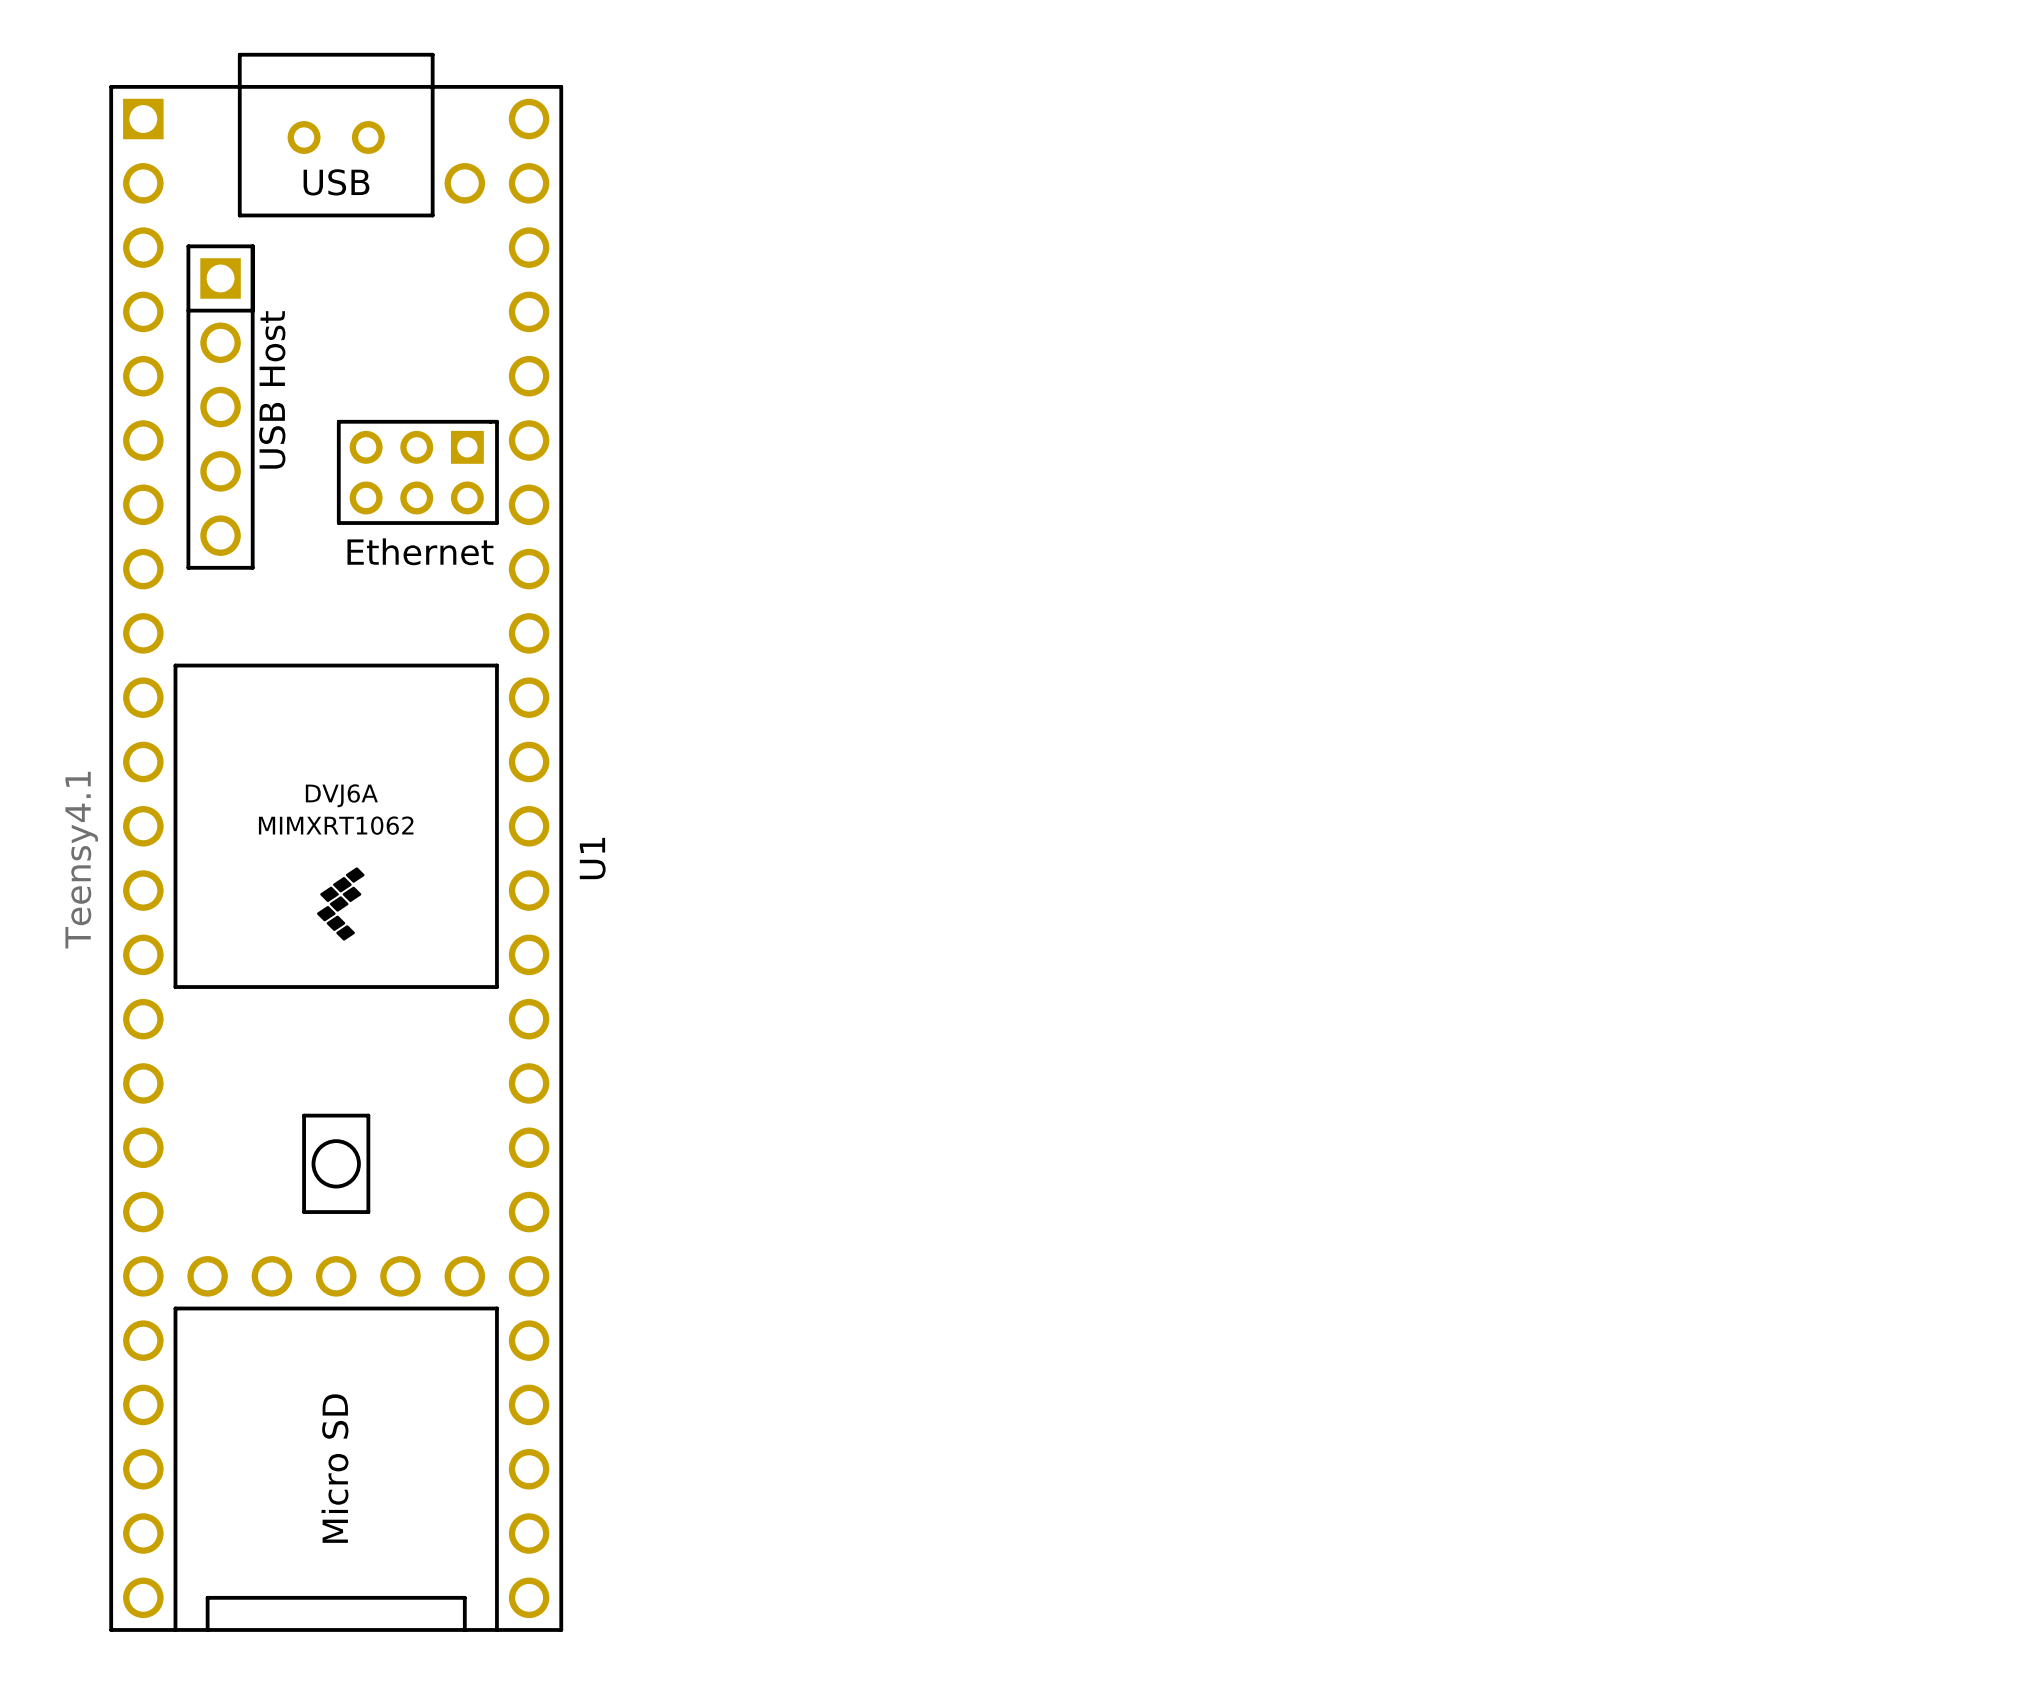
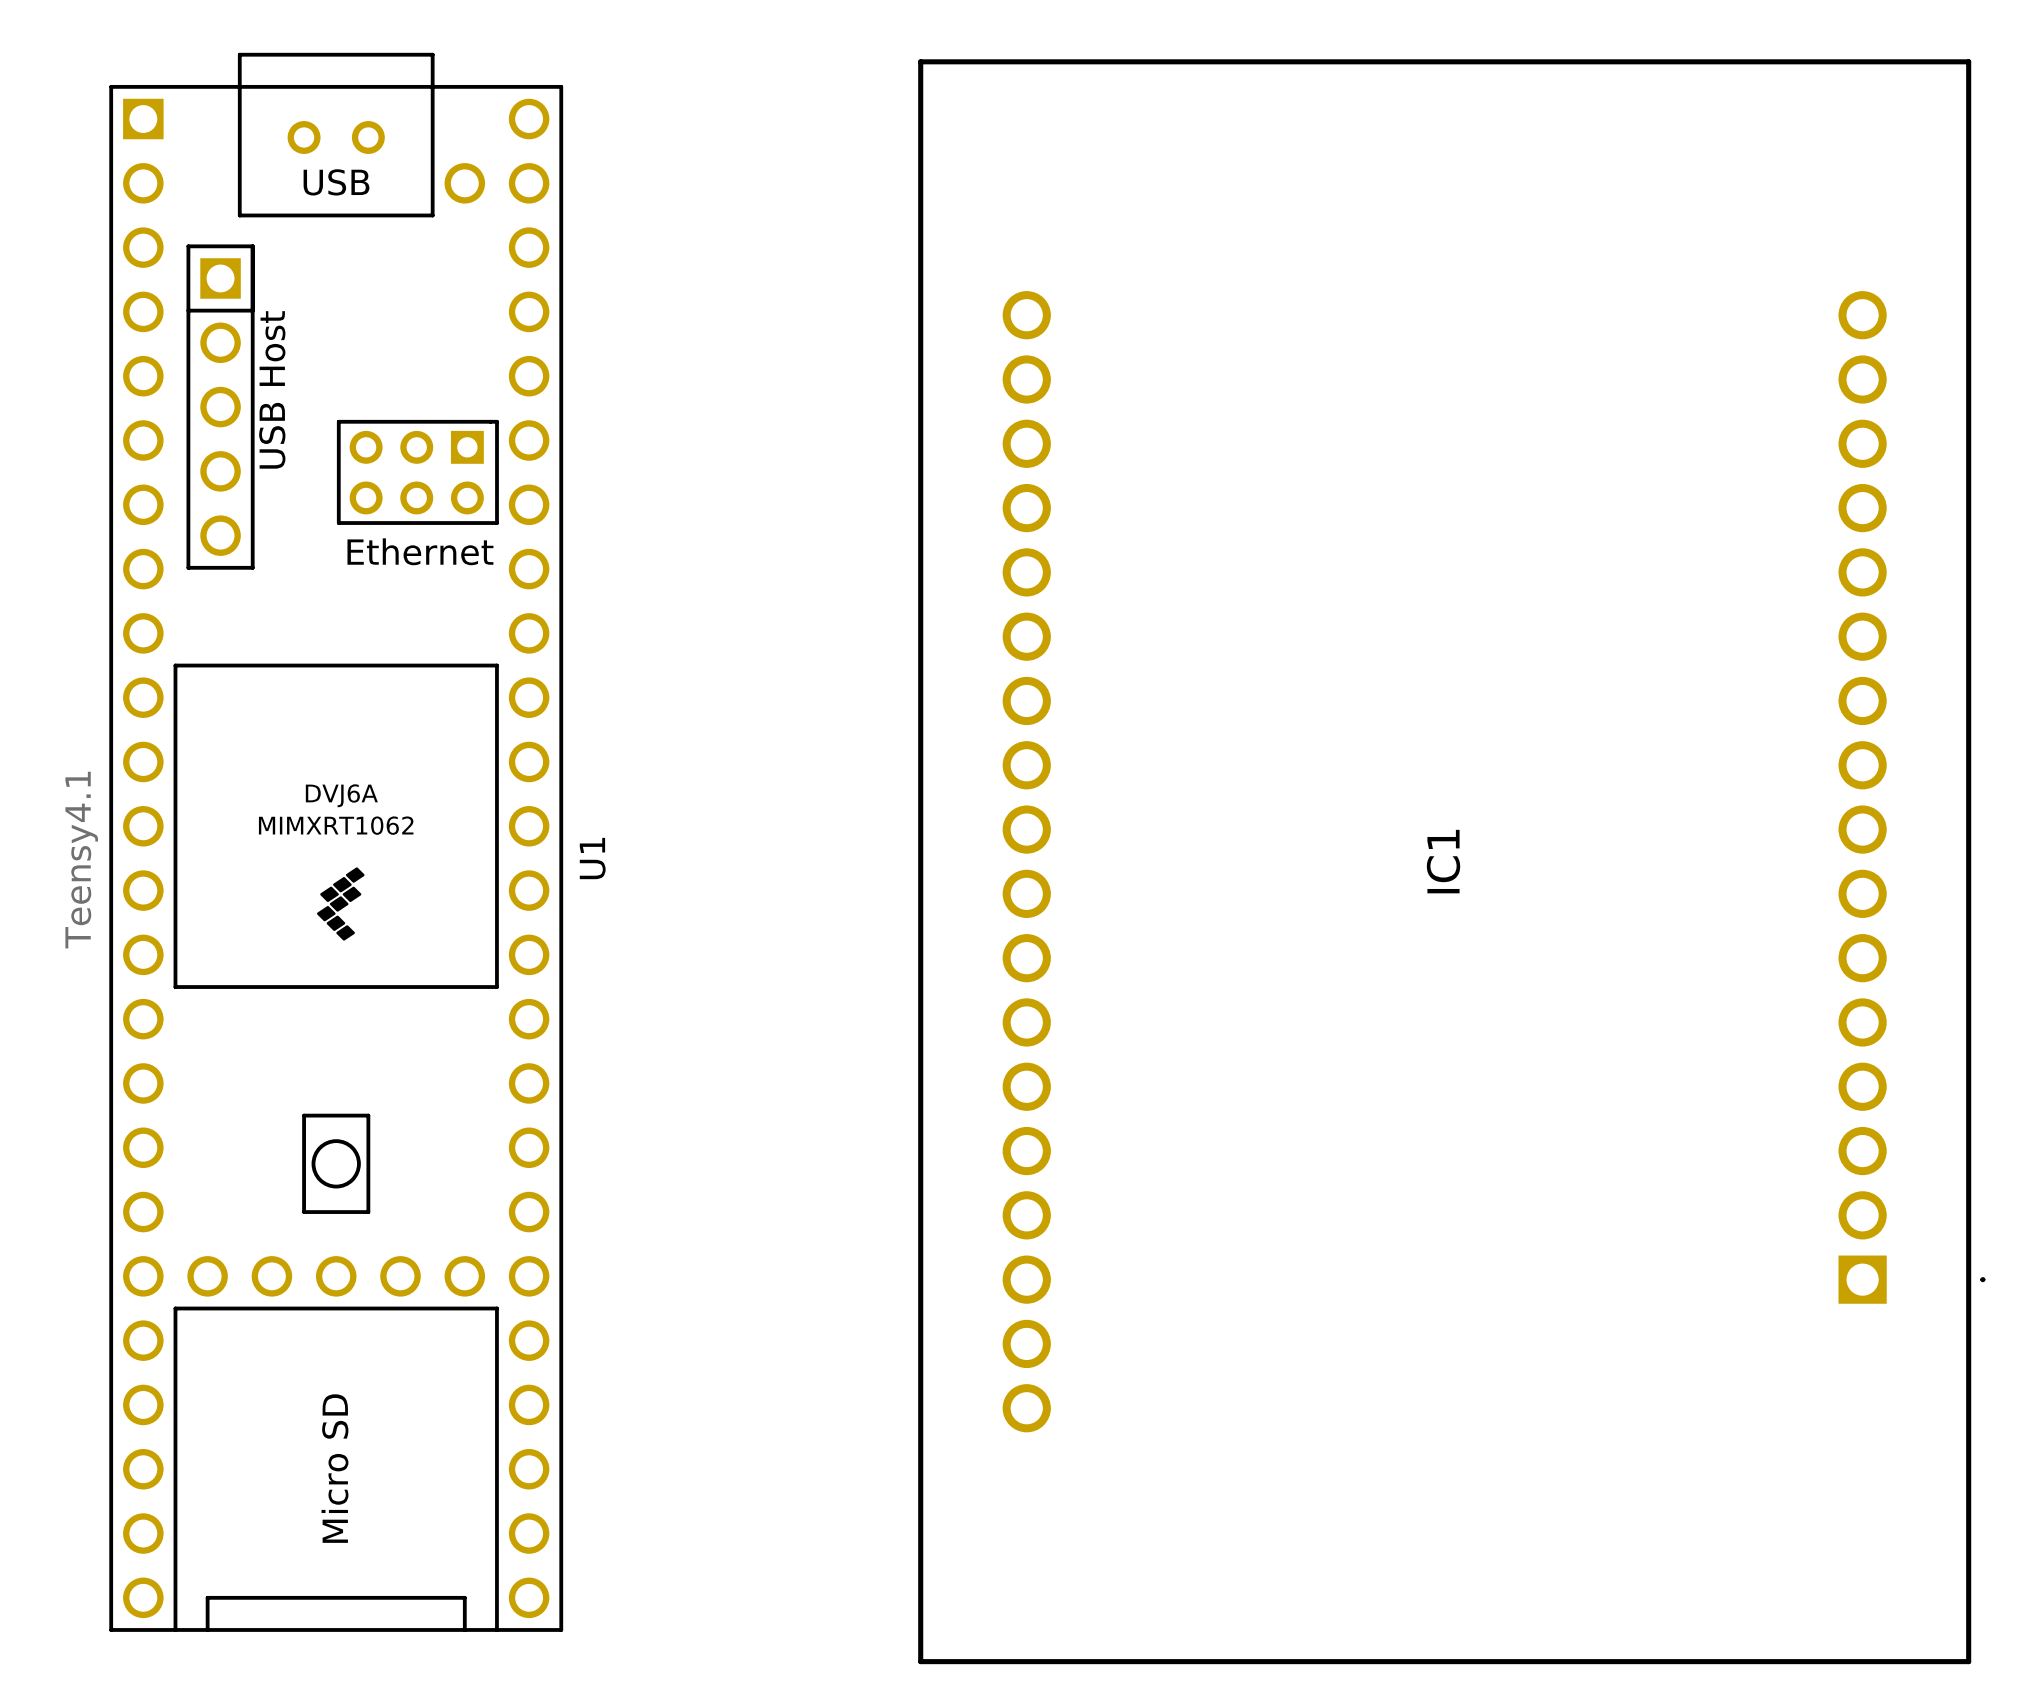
IC1: none -> (1451, 861)

